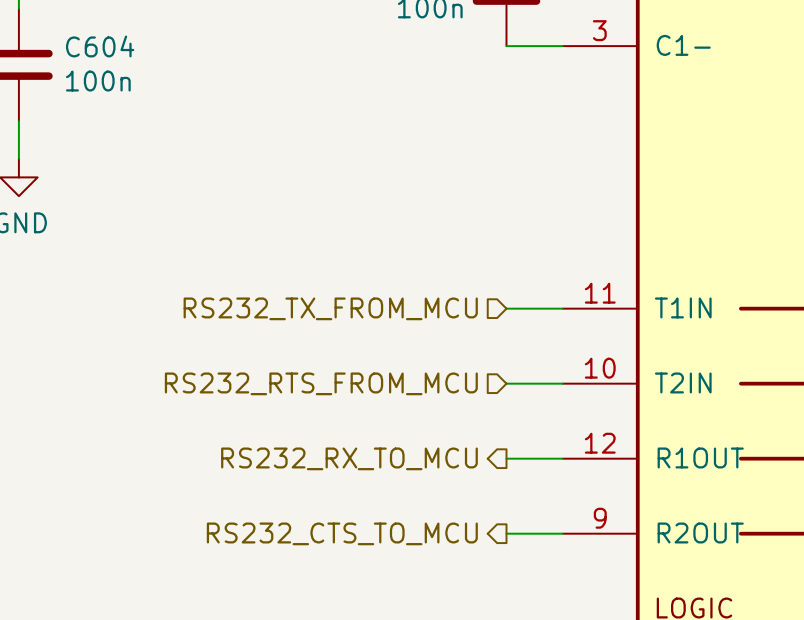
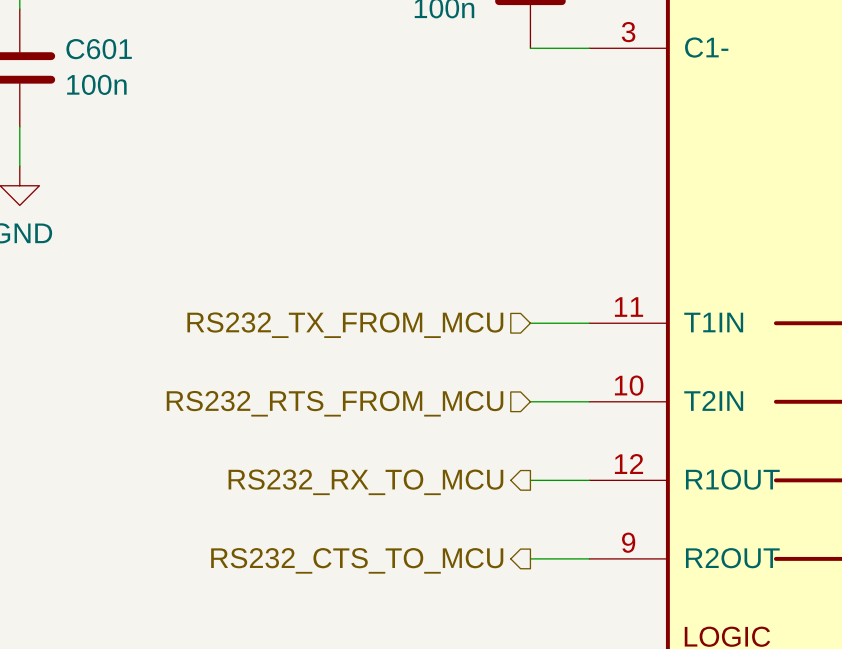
C604 name: C604 (100, 46) -> C601 (99, 49)

